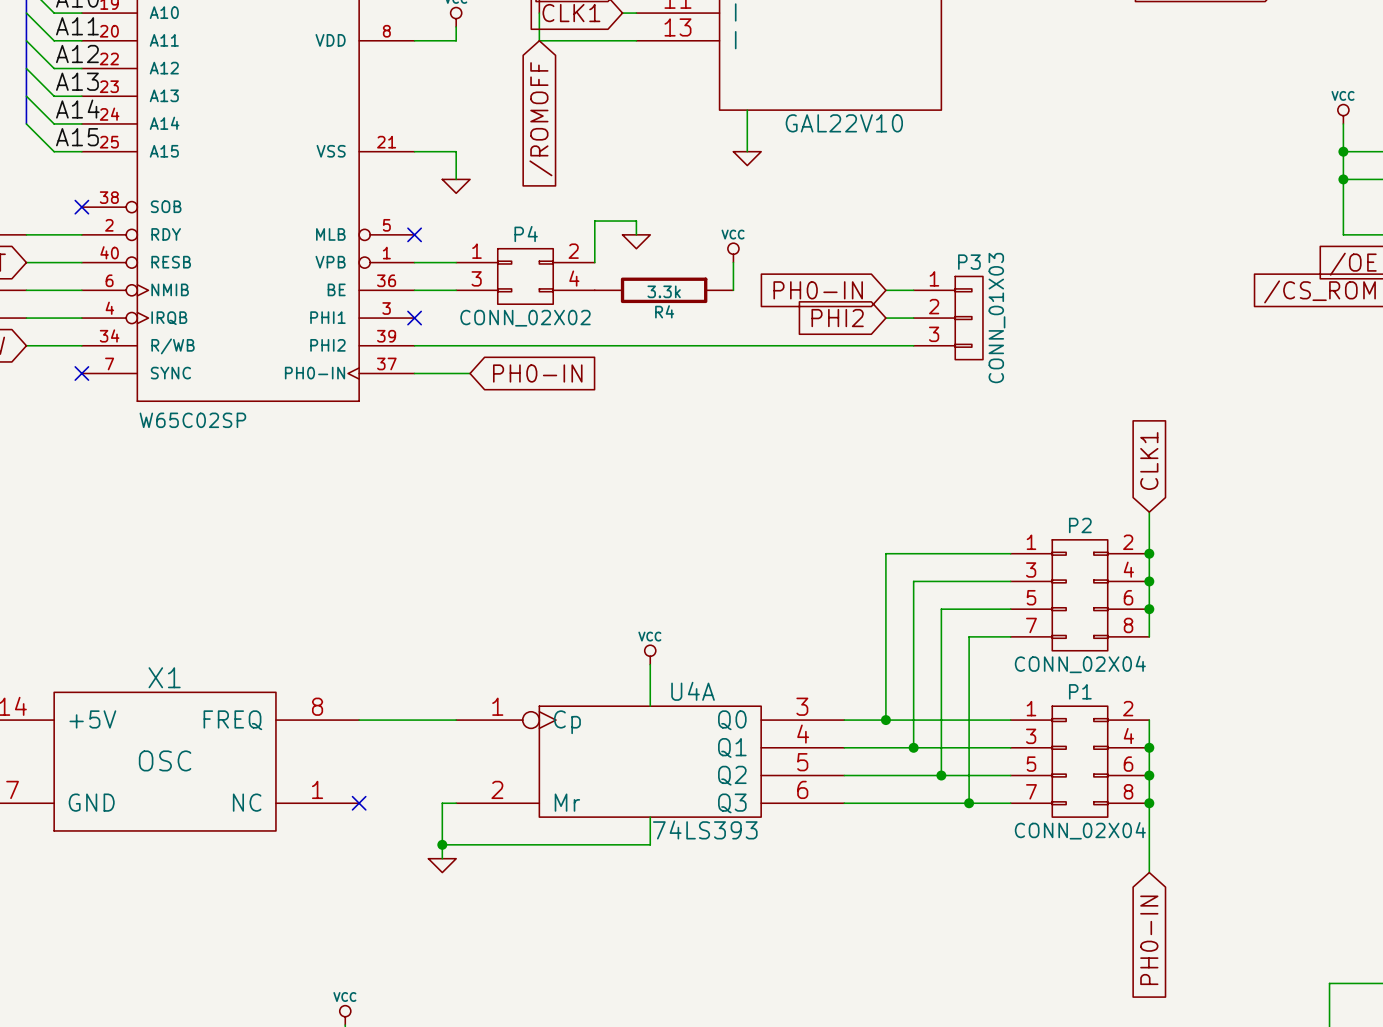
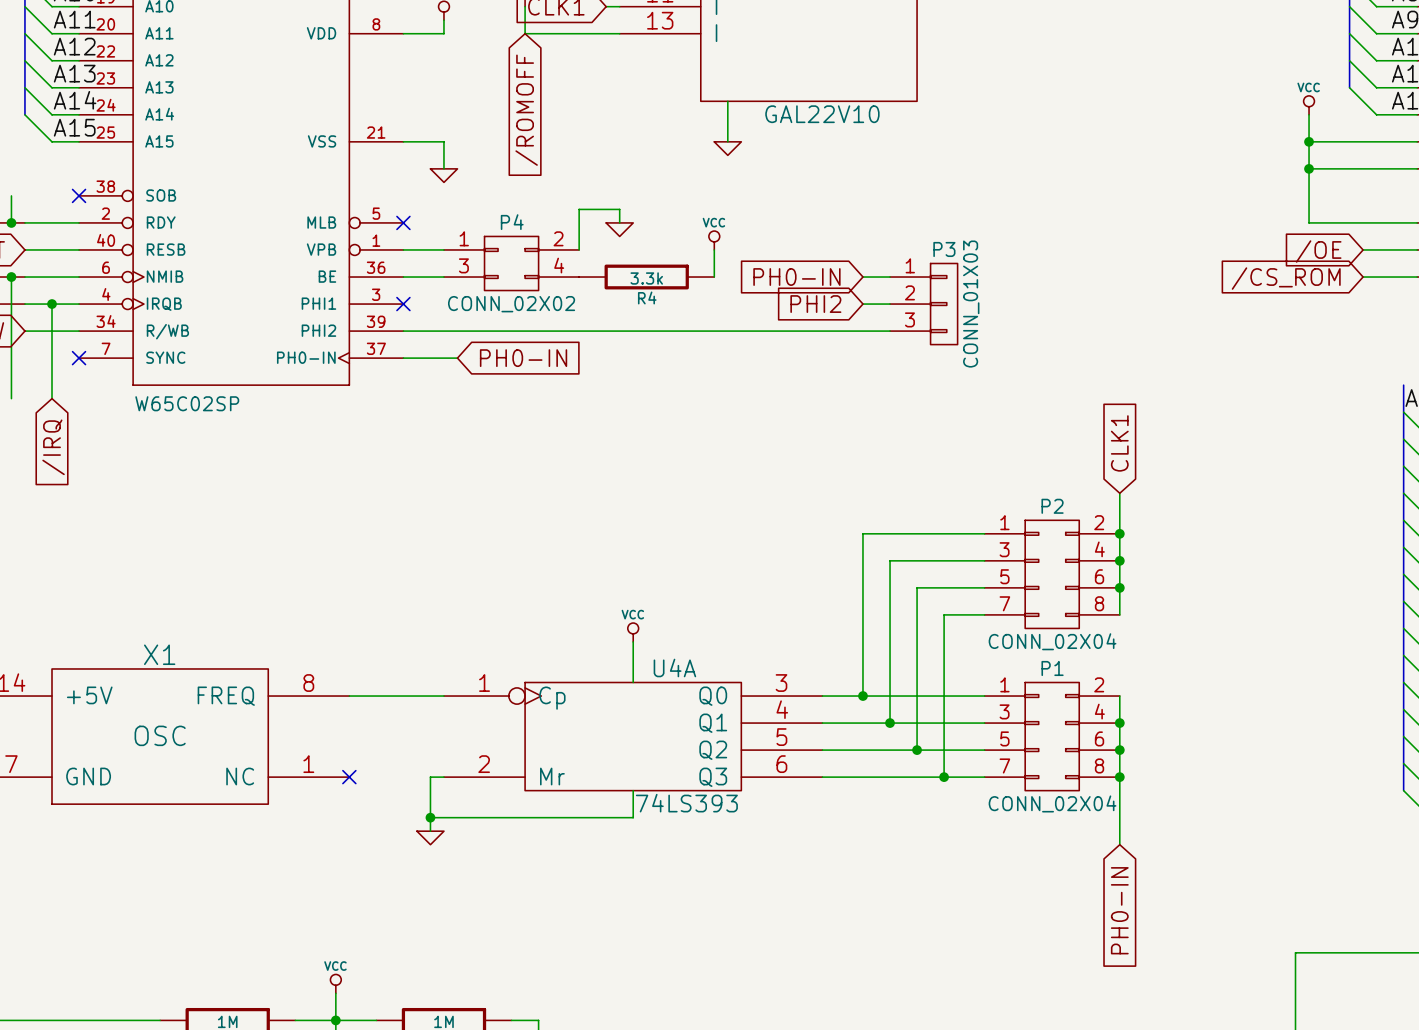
wire: none -> (11, 195) (11, 222)
junction: none -> (11, 222)
wire: none -> (11, 277) (11, 398)
junction: none -> (11, 277)
wire: none -> (52, 304) (52, 398)
junction: none -> (52, 304)
global label: none -> /IRQ (53, 447)

